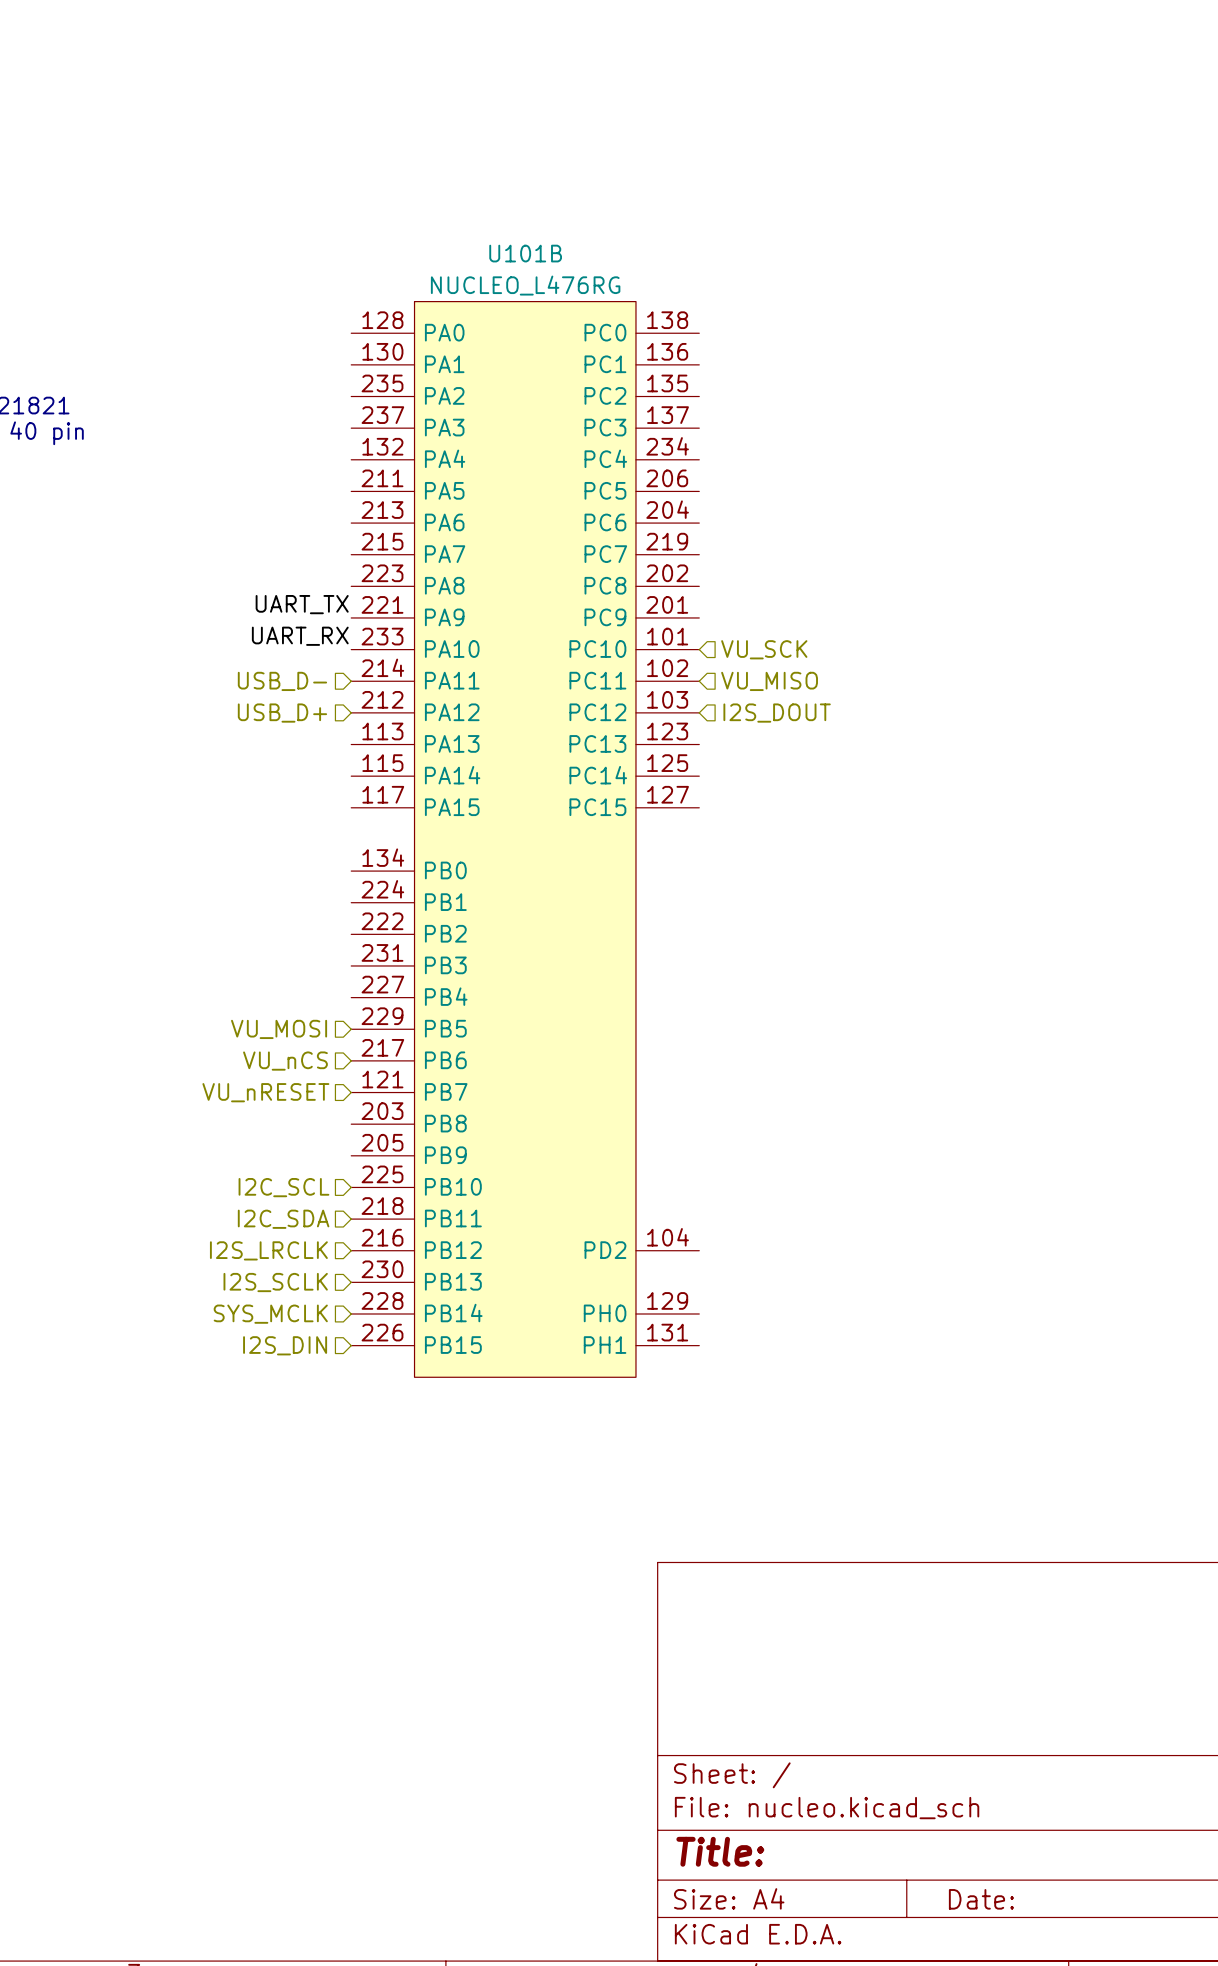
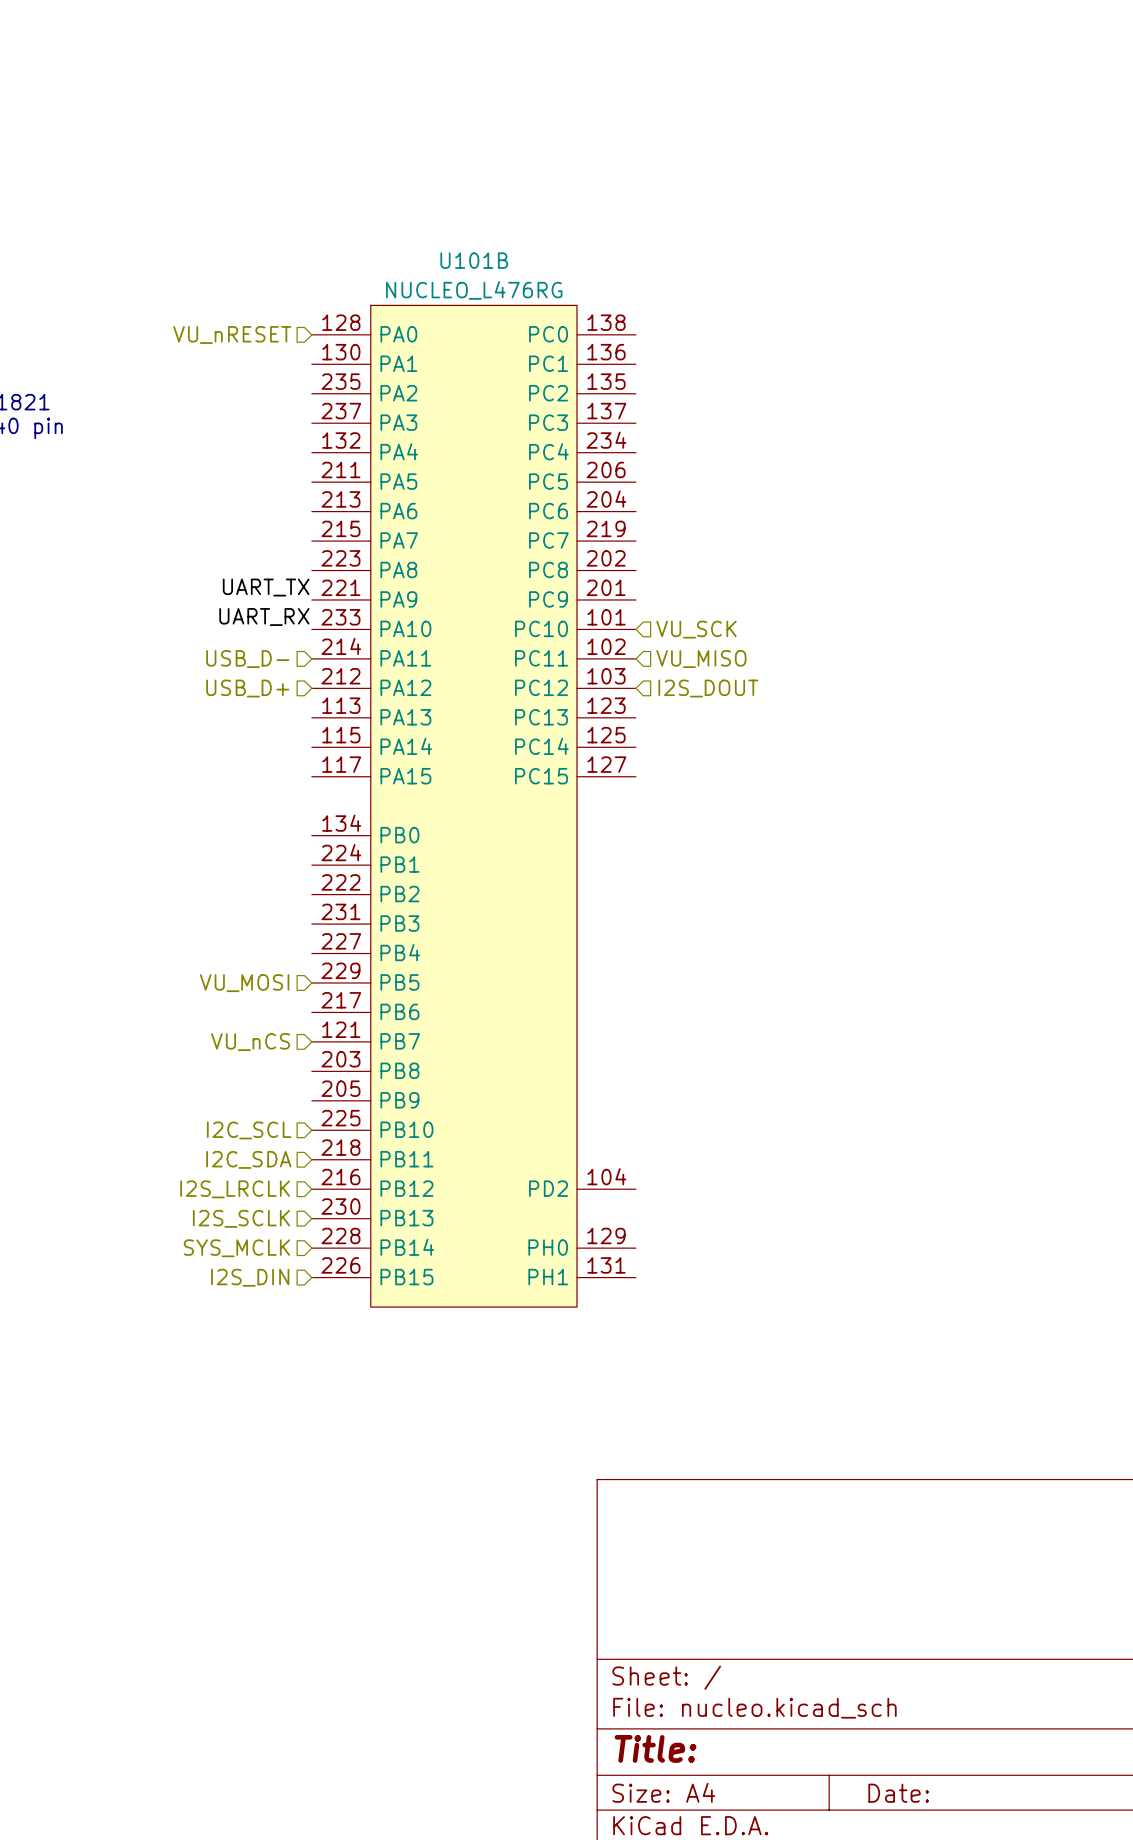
hierarchical label: none -> VU_nRESET (232, 334)
hierarchical label: VU_nCS (285, 1061) -> none
hierarchical label: VU_nRESET (265, 1092) -> VU_nCS (250, 1042)

